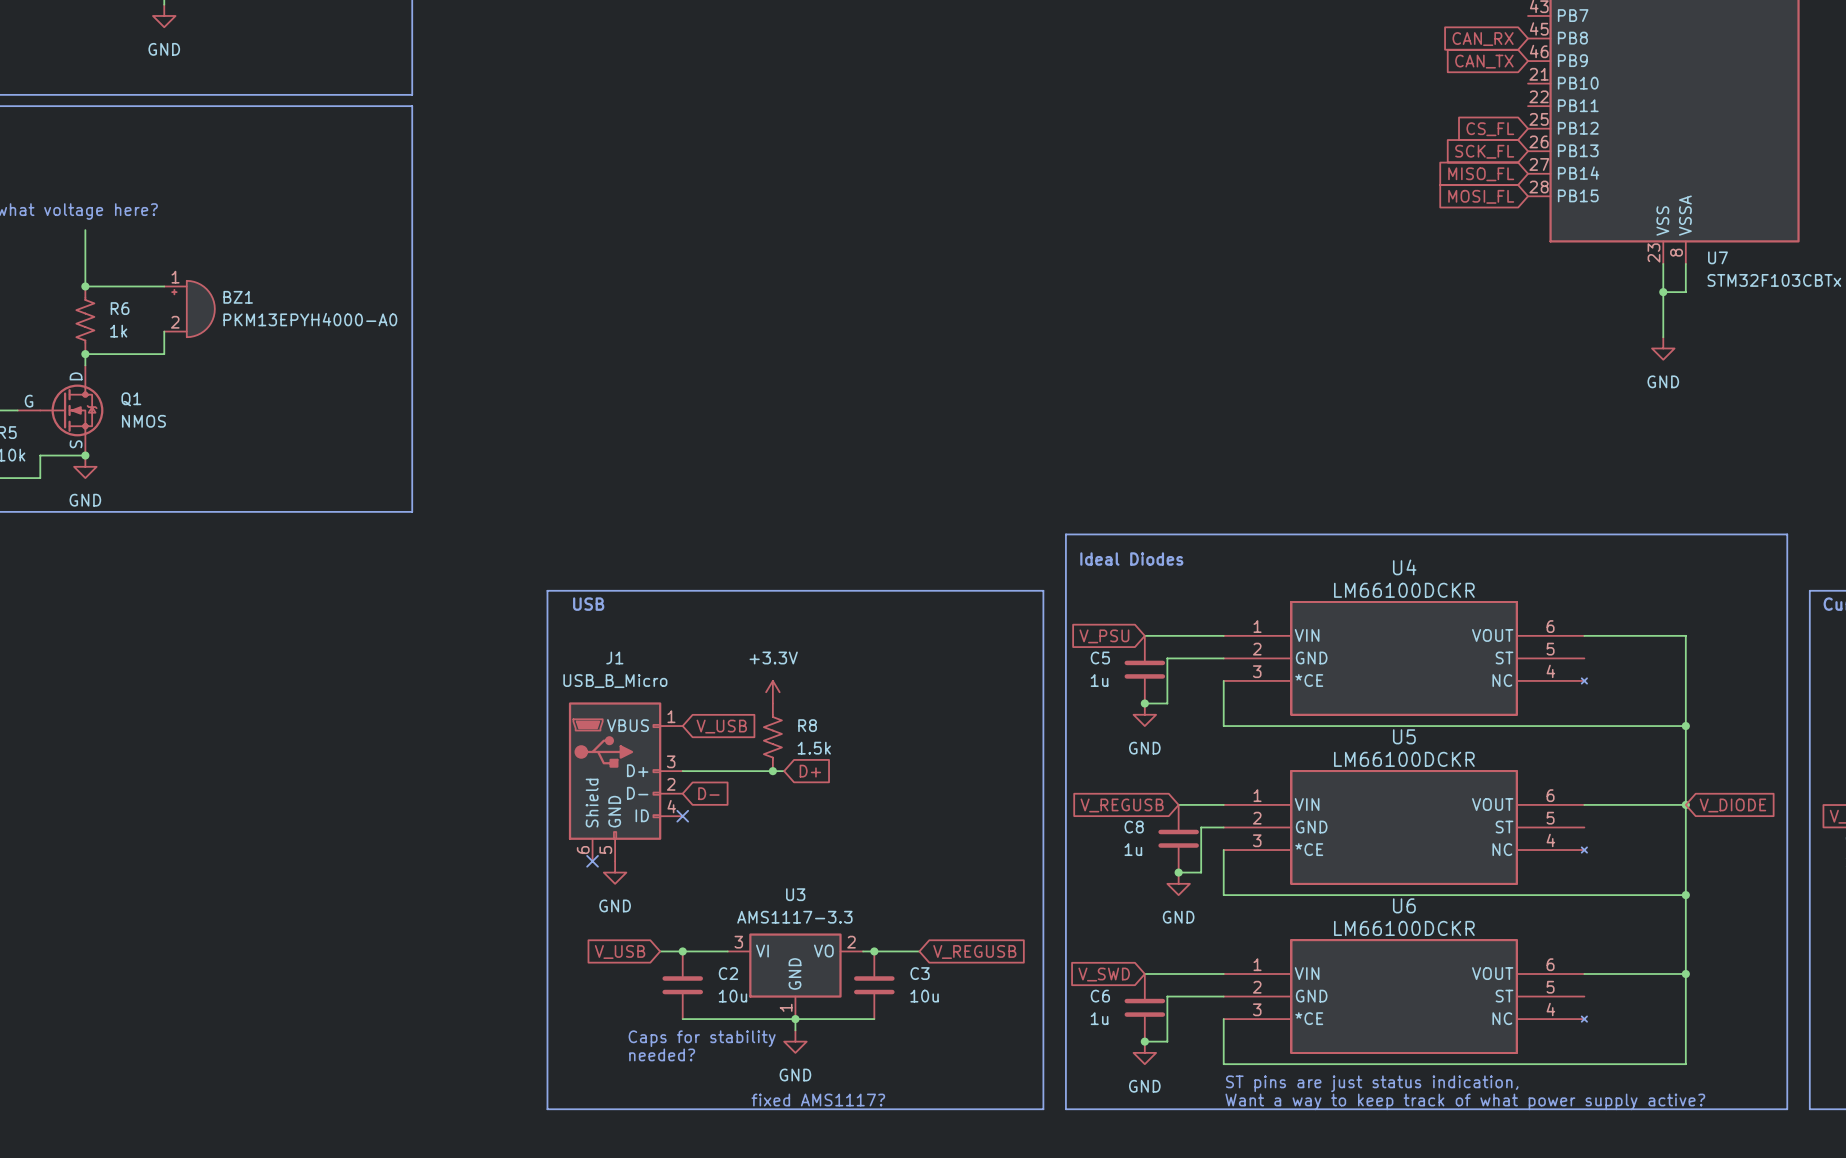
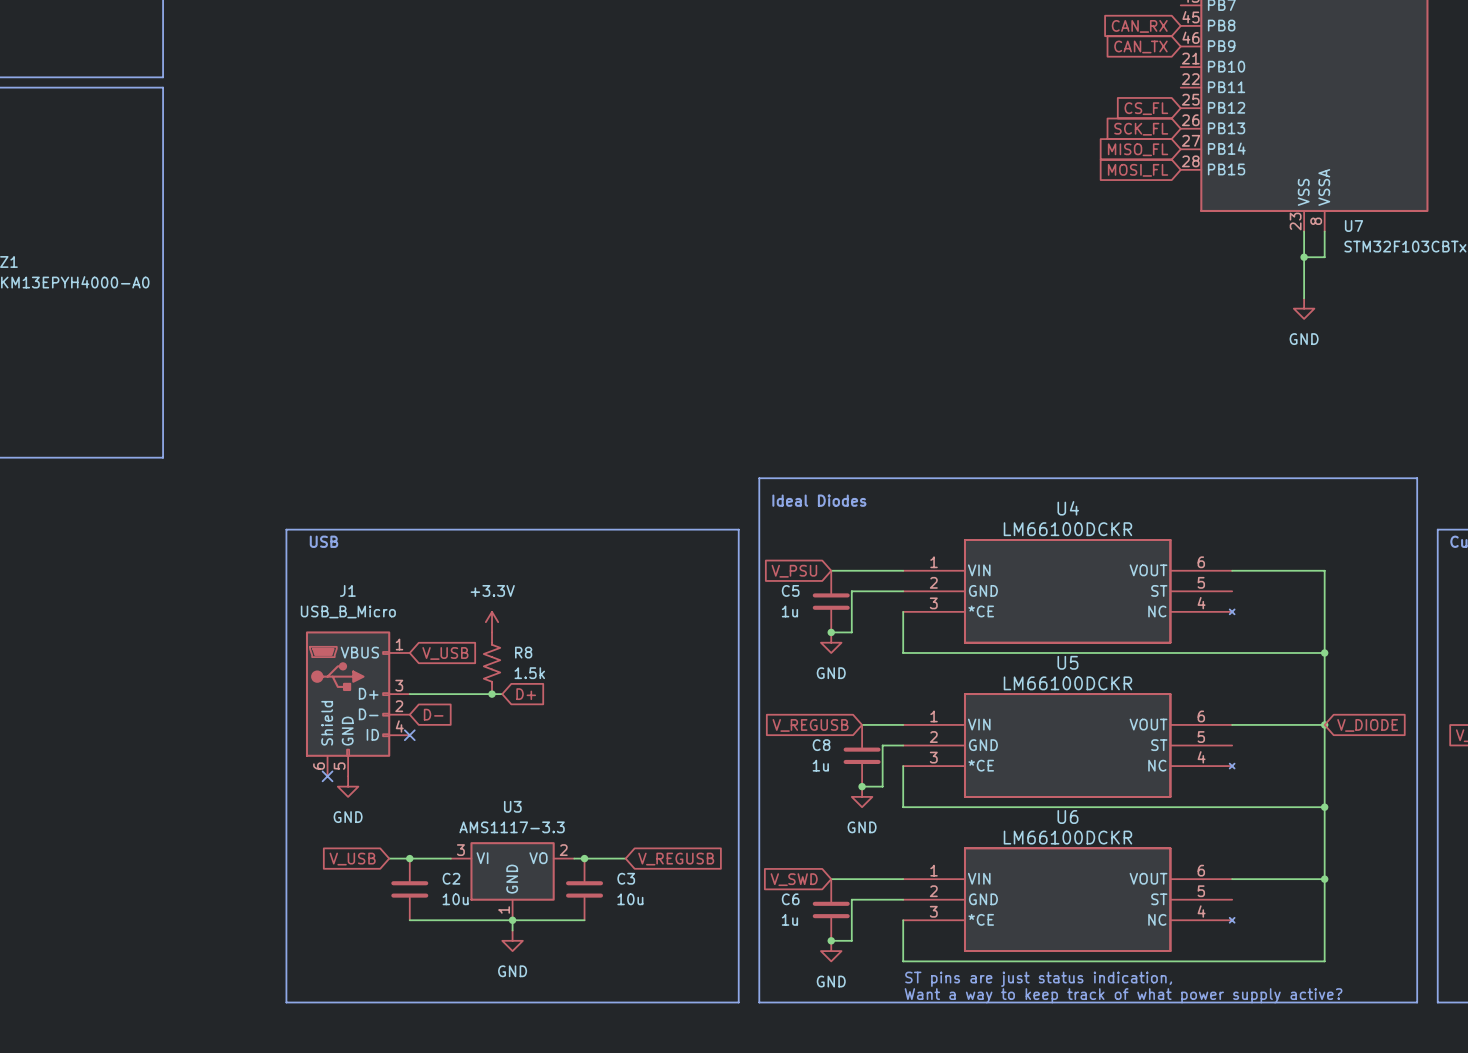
text: Caps for stability (702, 1038) -> none
text: needed? (662, 1054) -> none
text: fixed AMS1117? (818, 1100) -> none

